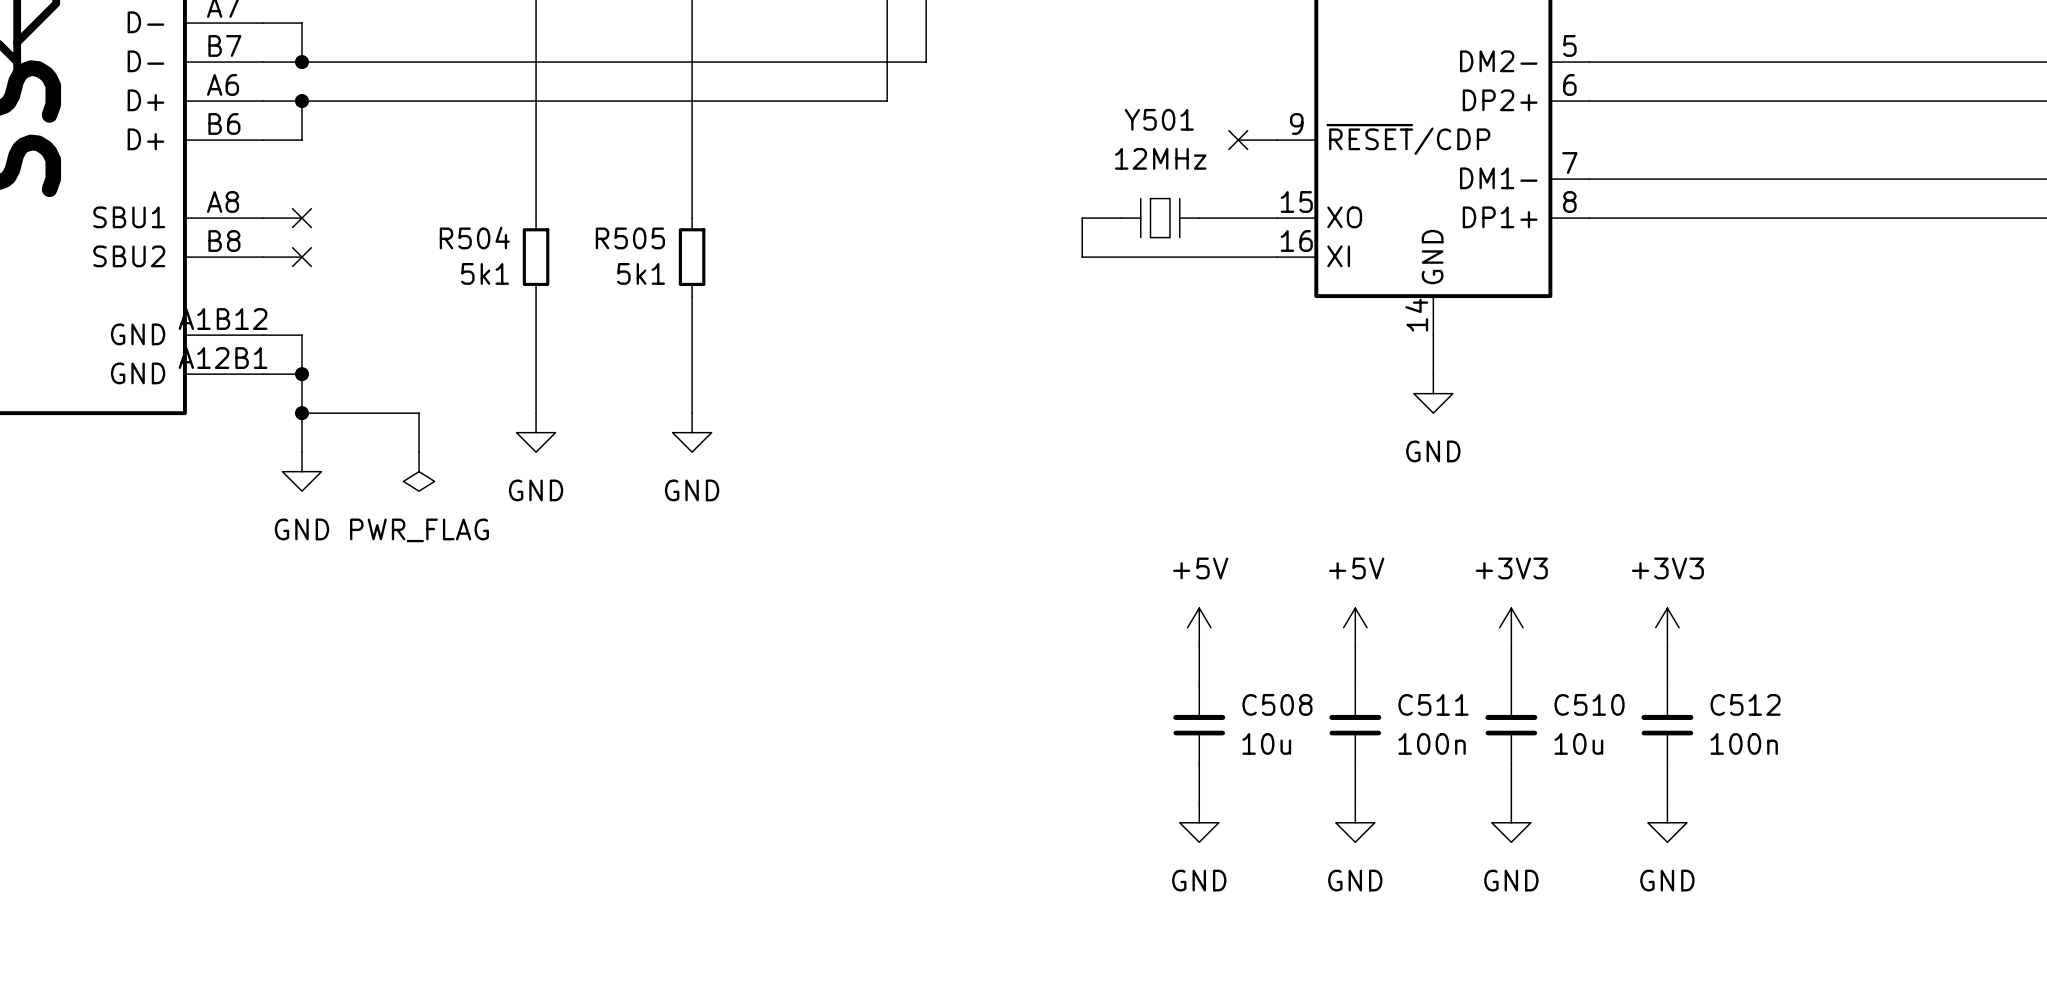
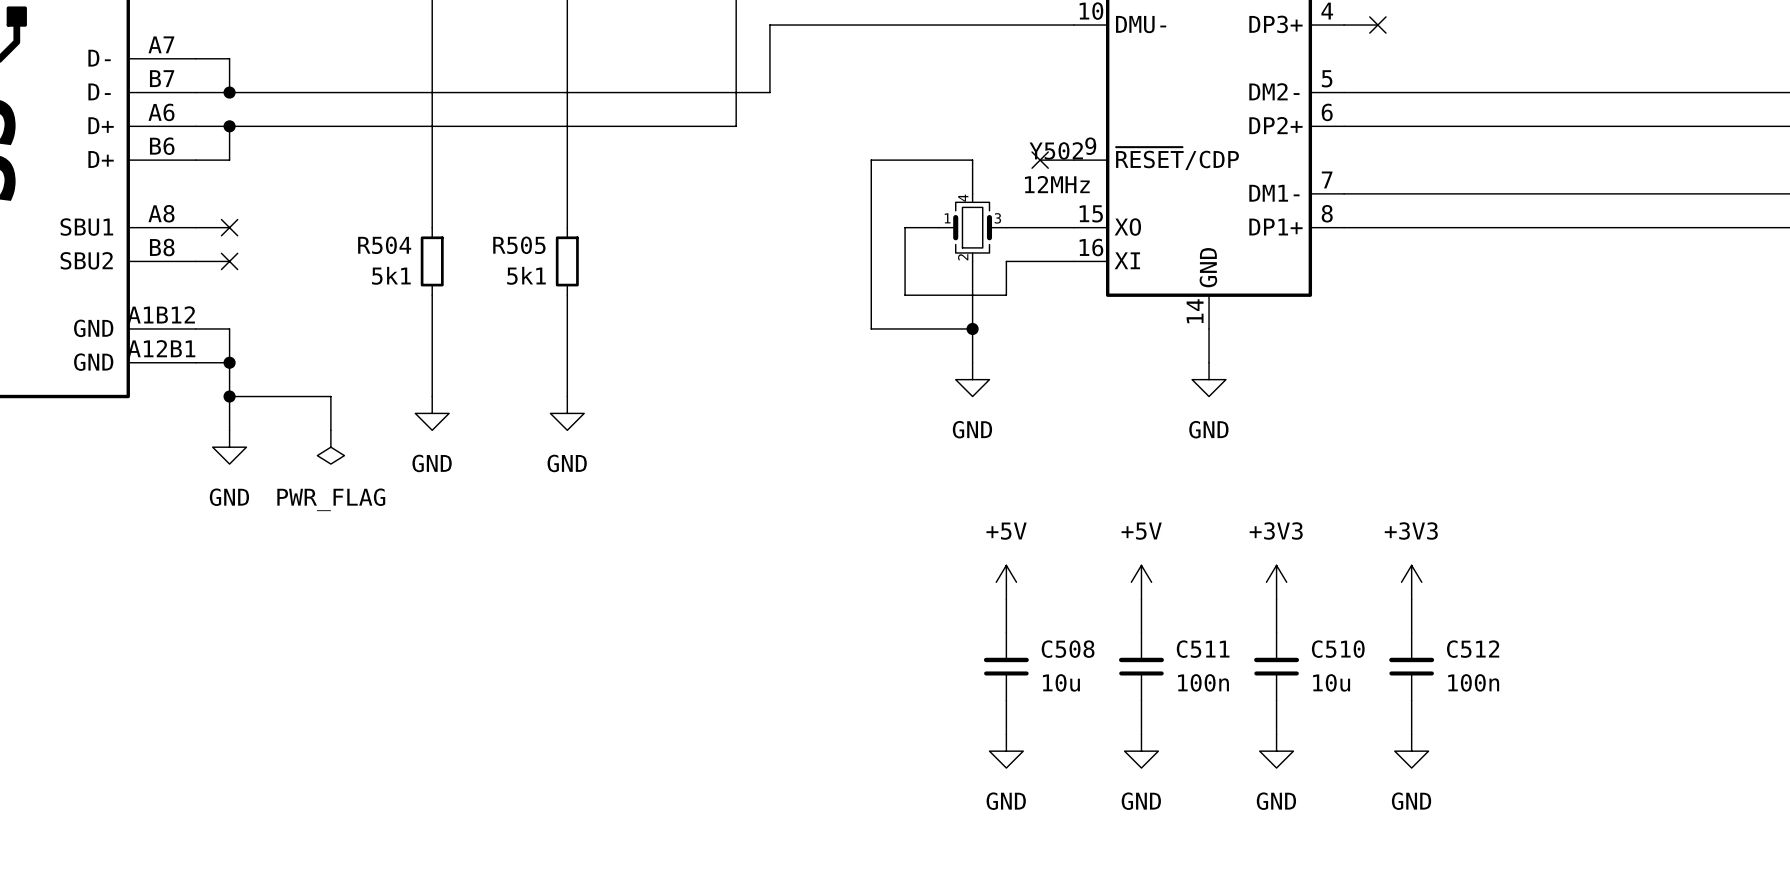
wire: none -> (972, 193) (972, 160) (871, 160) (871, 328) (972, 328)
Y501: 12MHz (1160, 218) -> none
Y502: none -> 12MHz (972, 227)
wire: (1082, 257) (1199, 257) -> (905, 261) (905, 295) (1006, 295) (1006, 261)
wire: none -> (972, 261) (972, 362)
junction: none -> (972, 328)
power symbol: none -> GND (972, 379)

